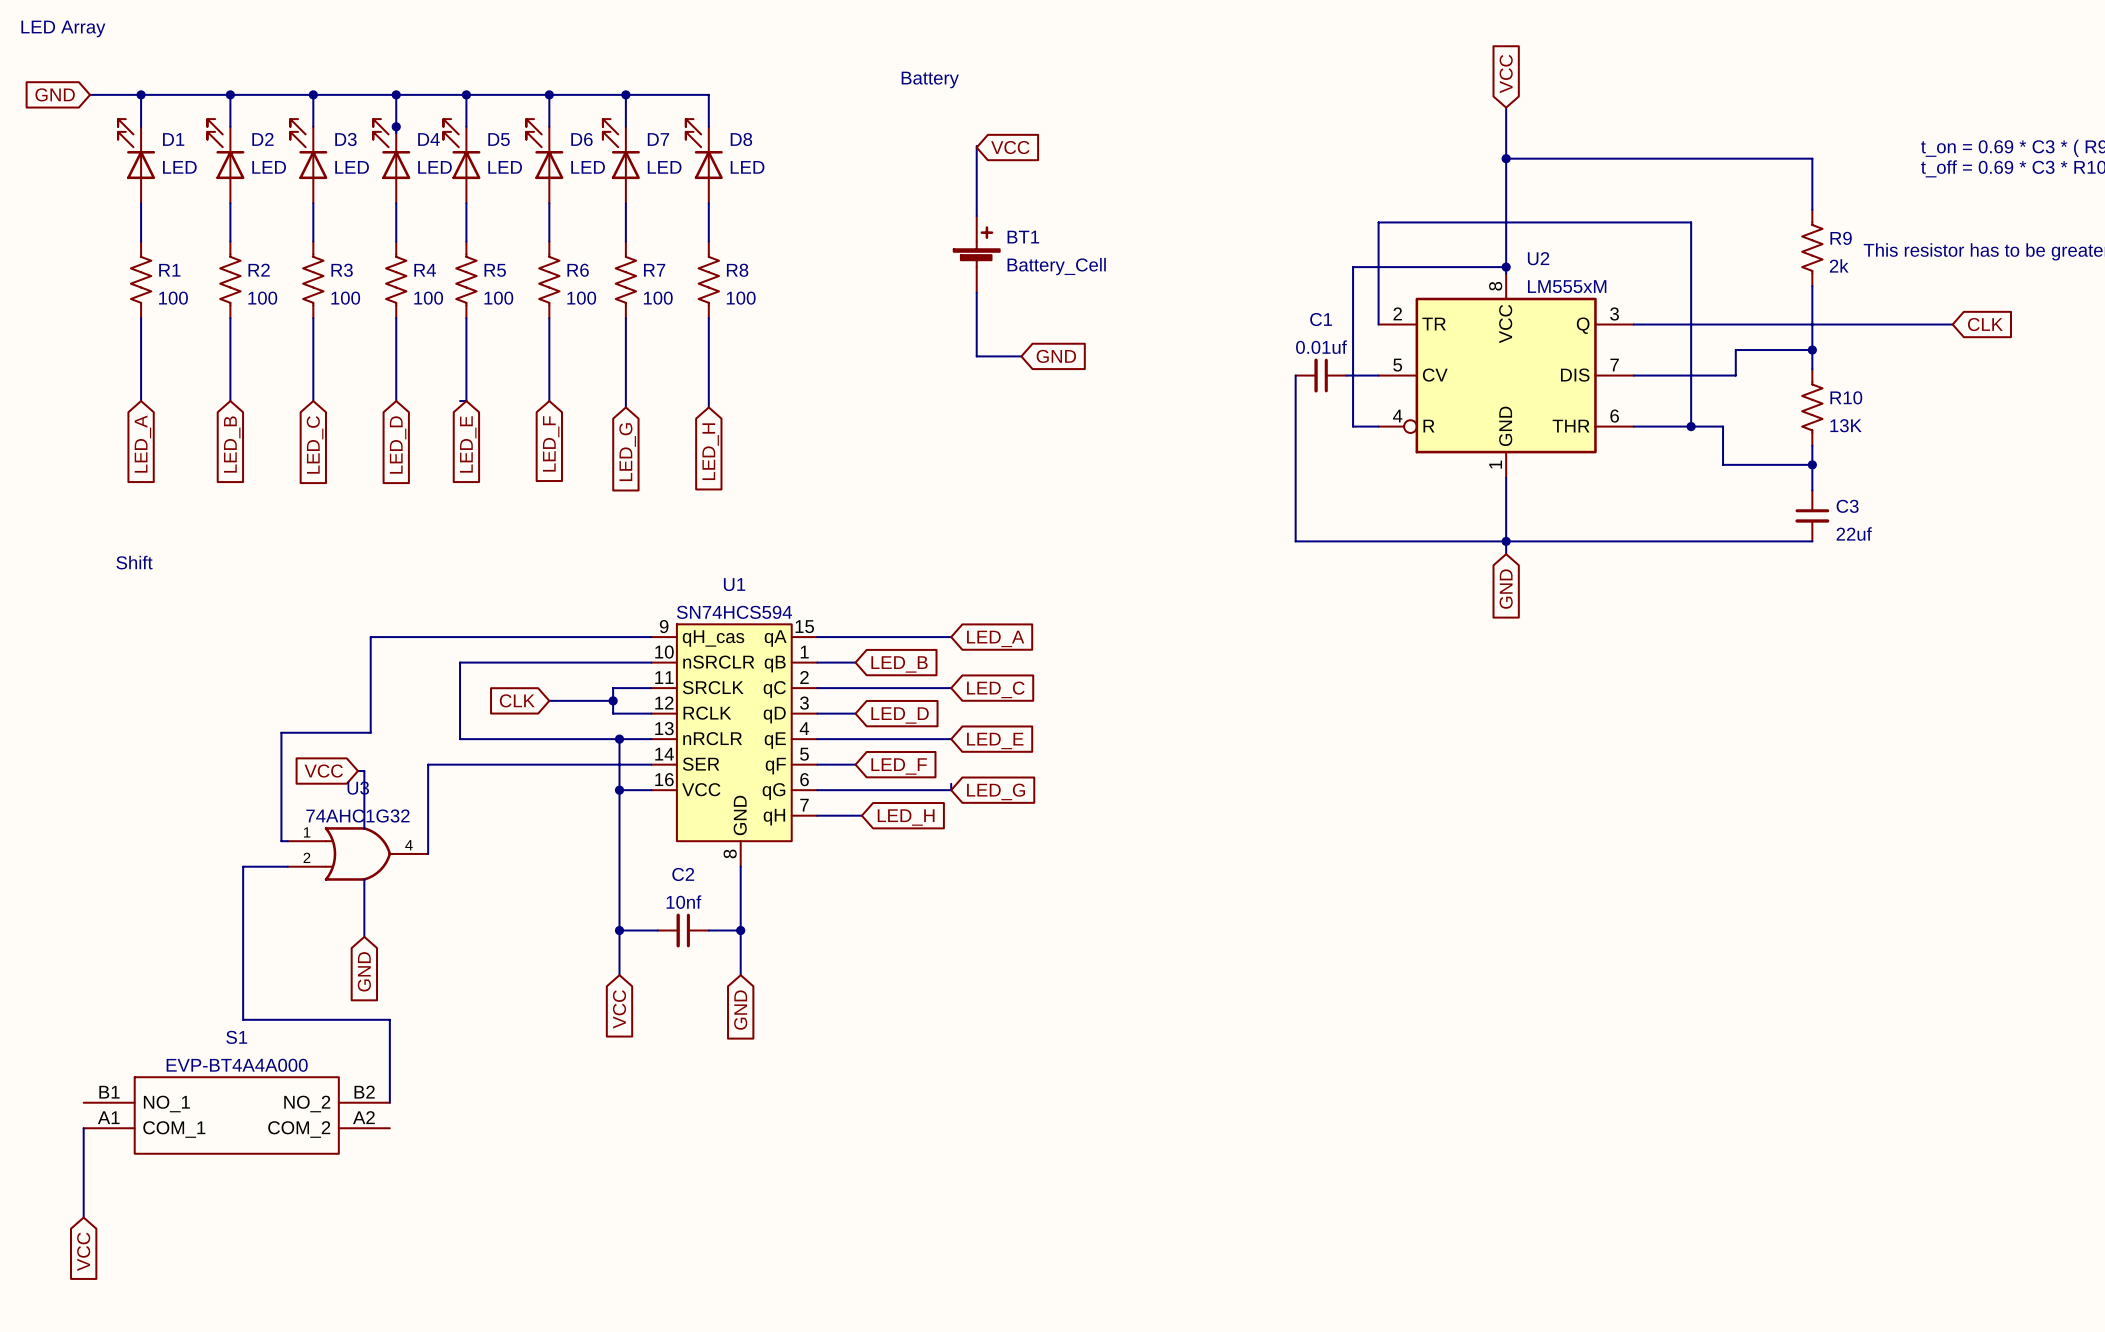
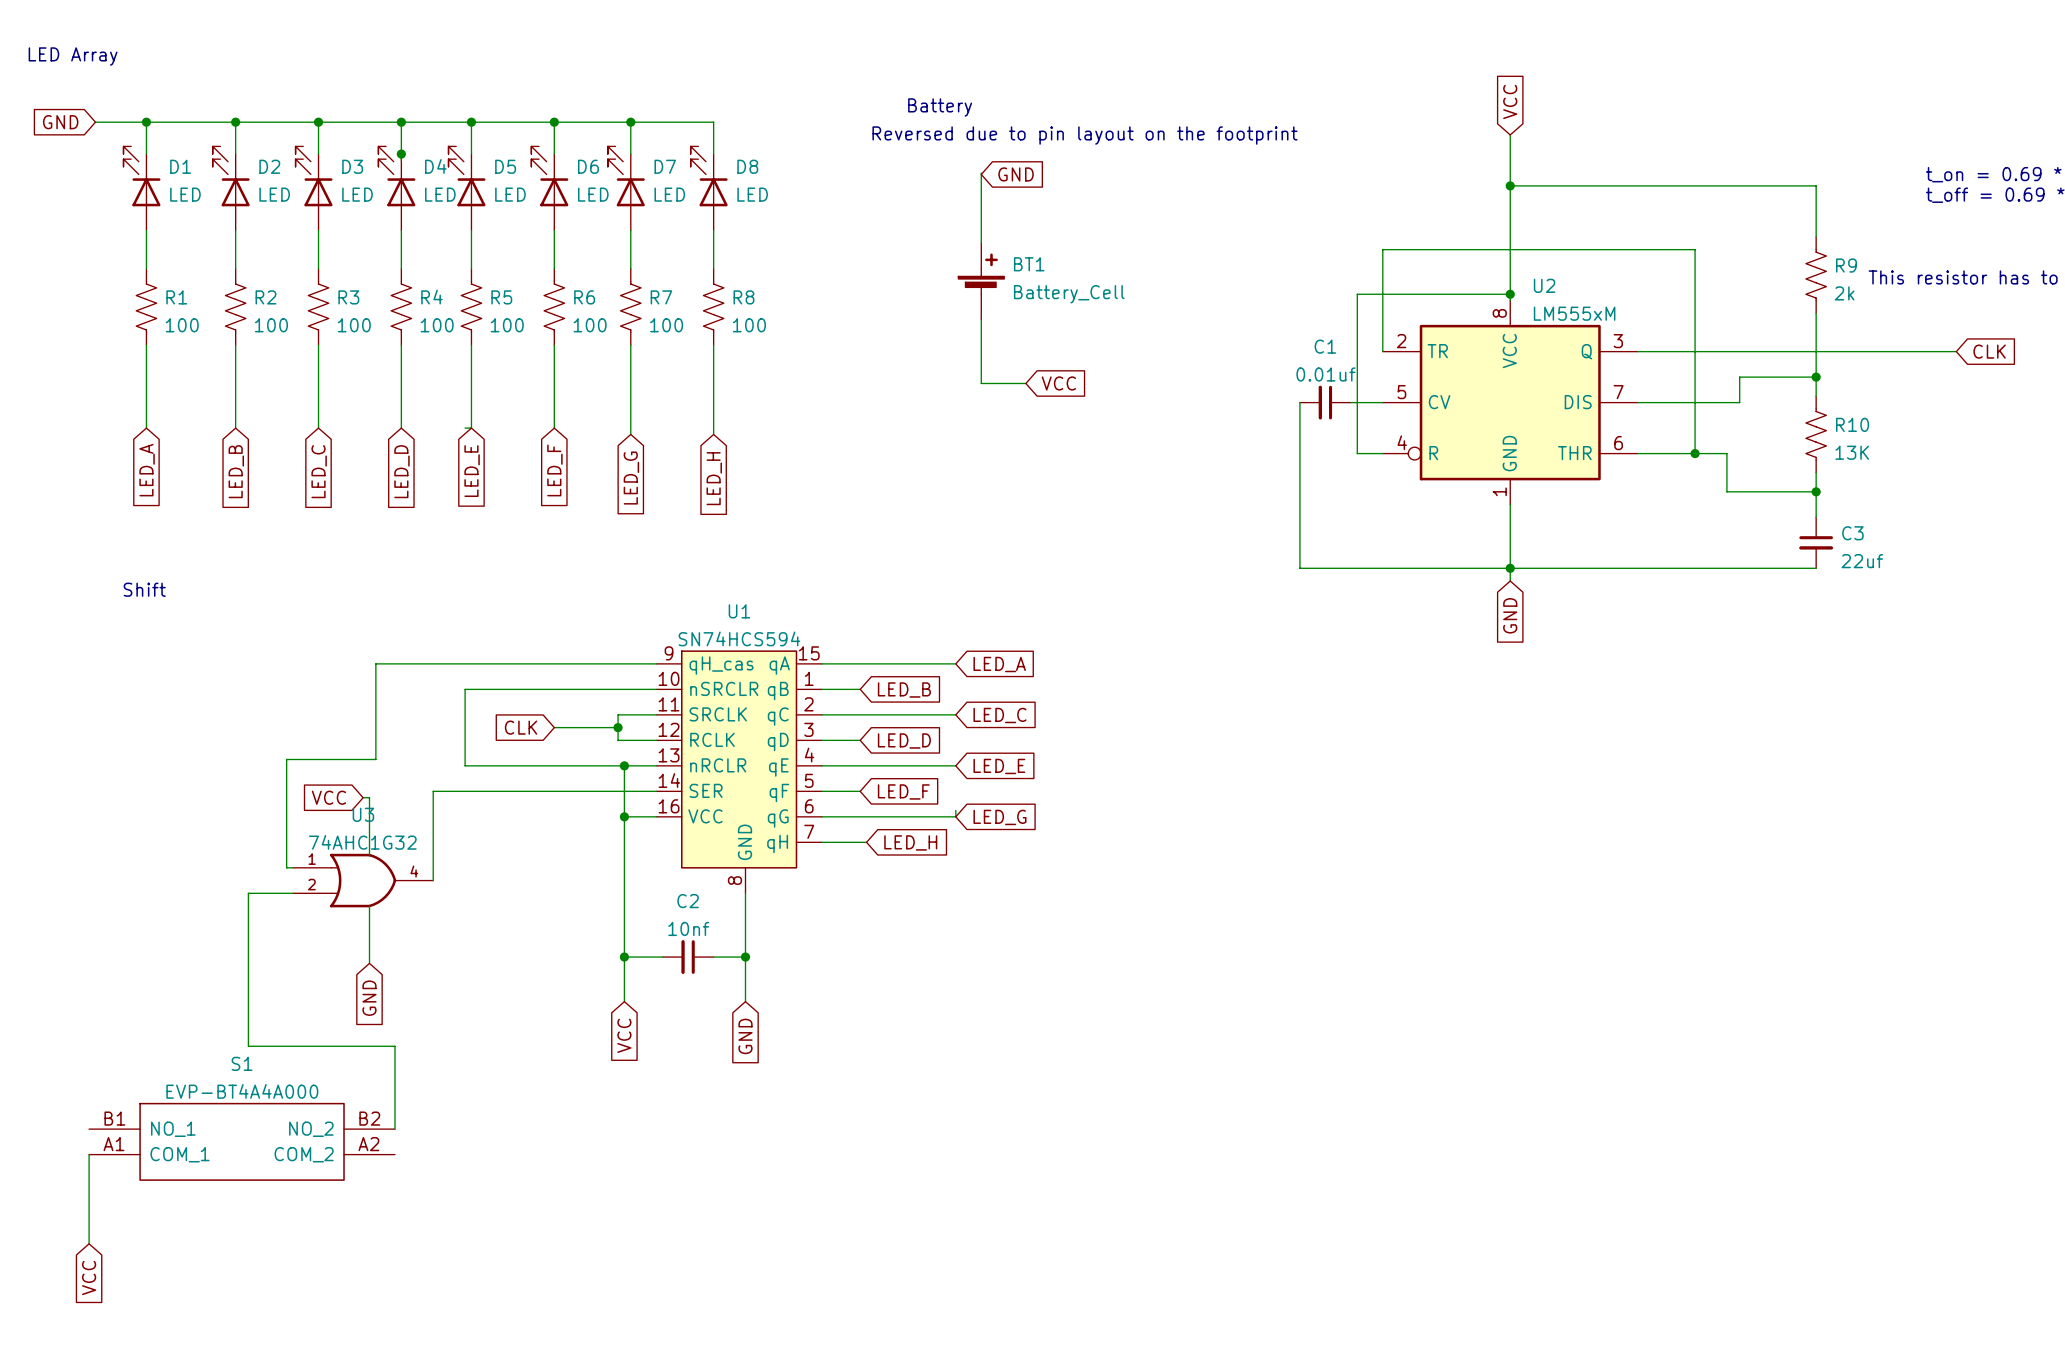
text: none -> Reversed due to pin layout on the footprint (1085, 135)
global label: VCC (1010, 147) -> GND (1016, 174)
global label: GND (1056, 356) -> VCC (1058, 383)

